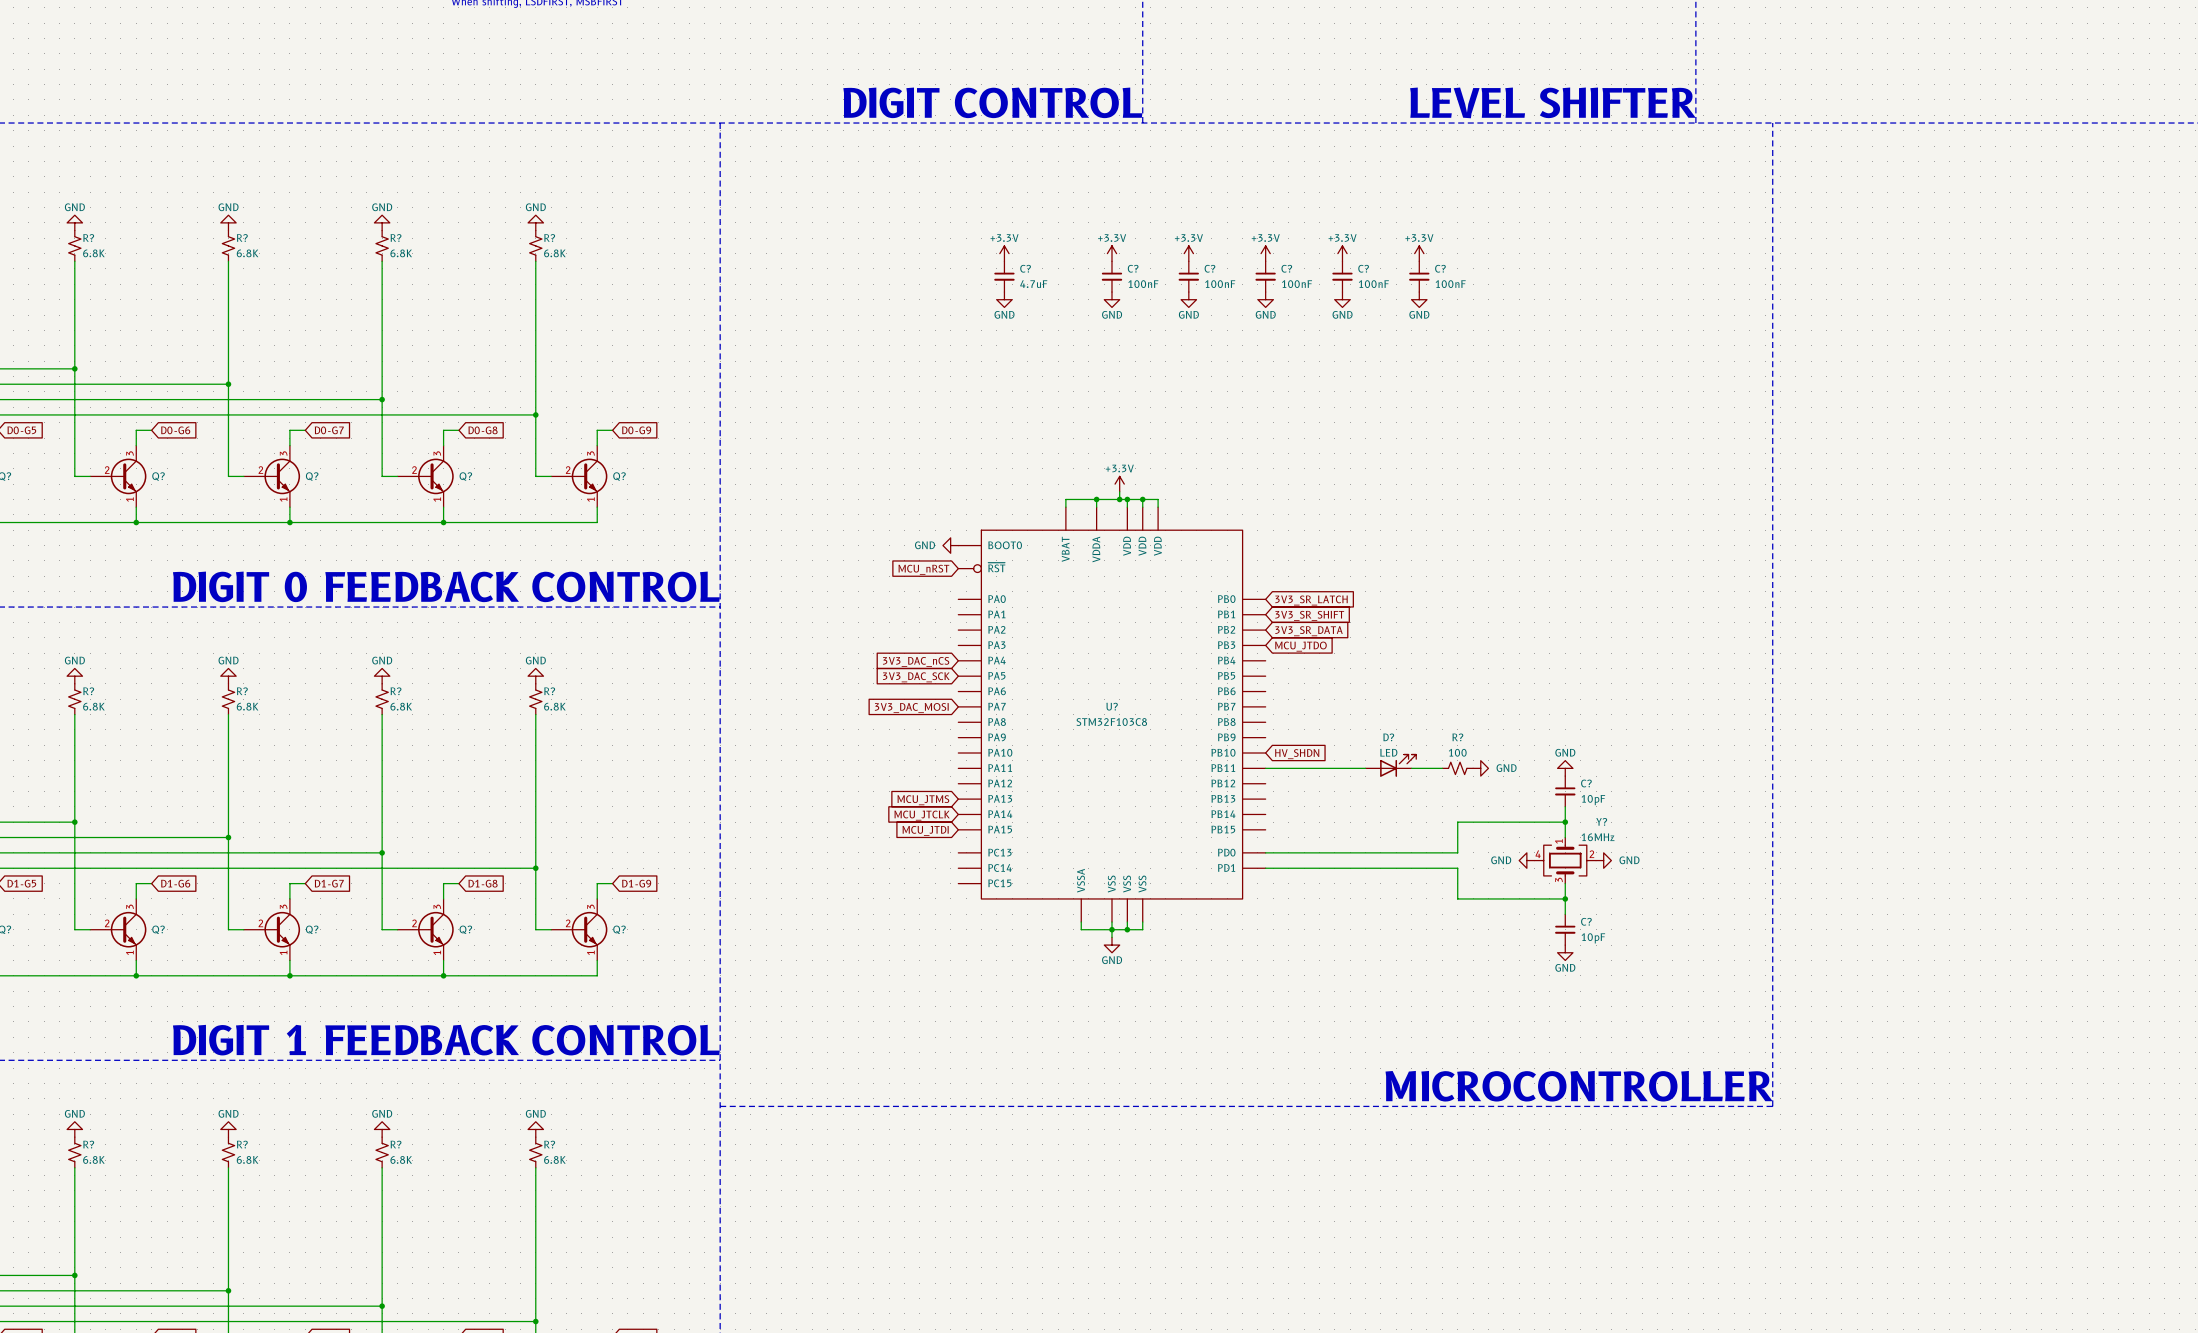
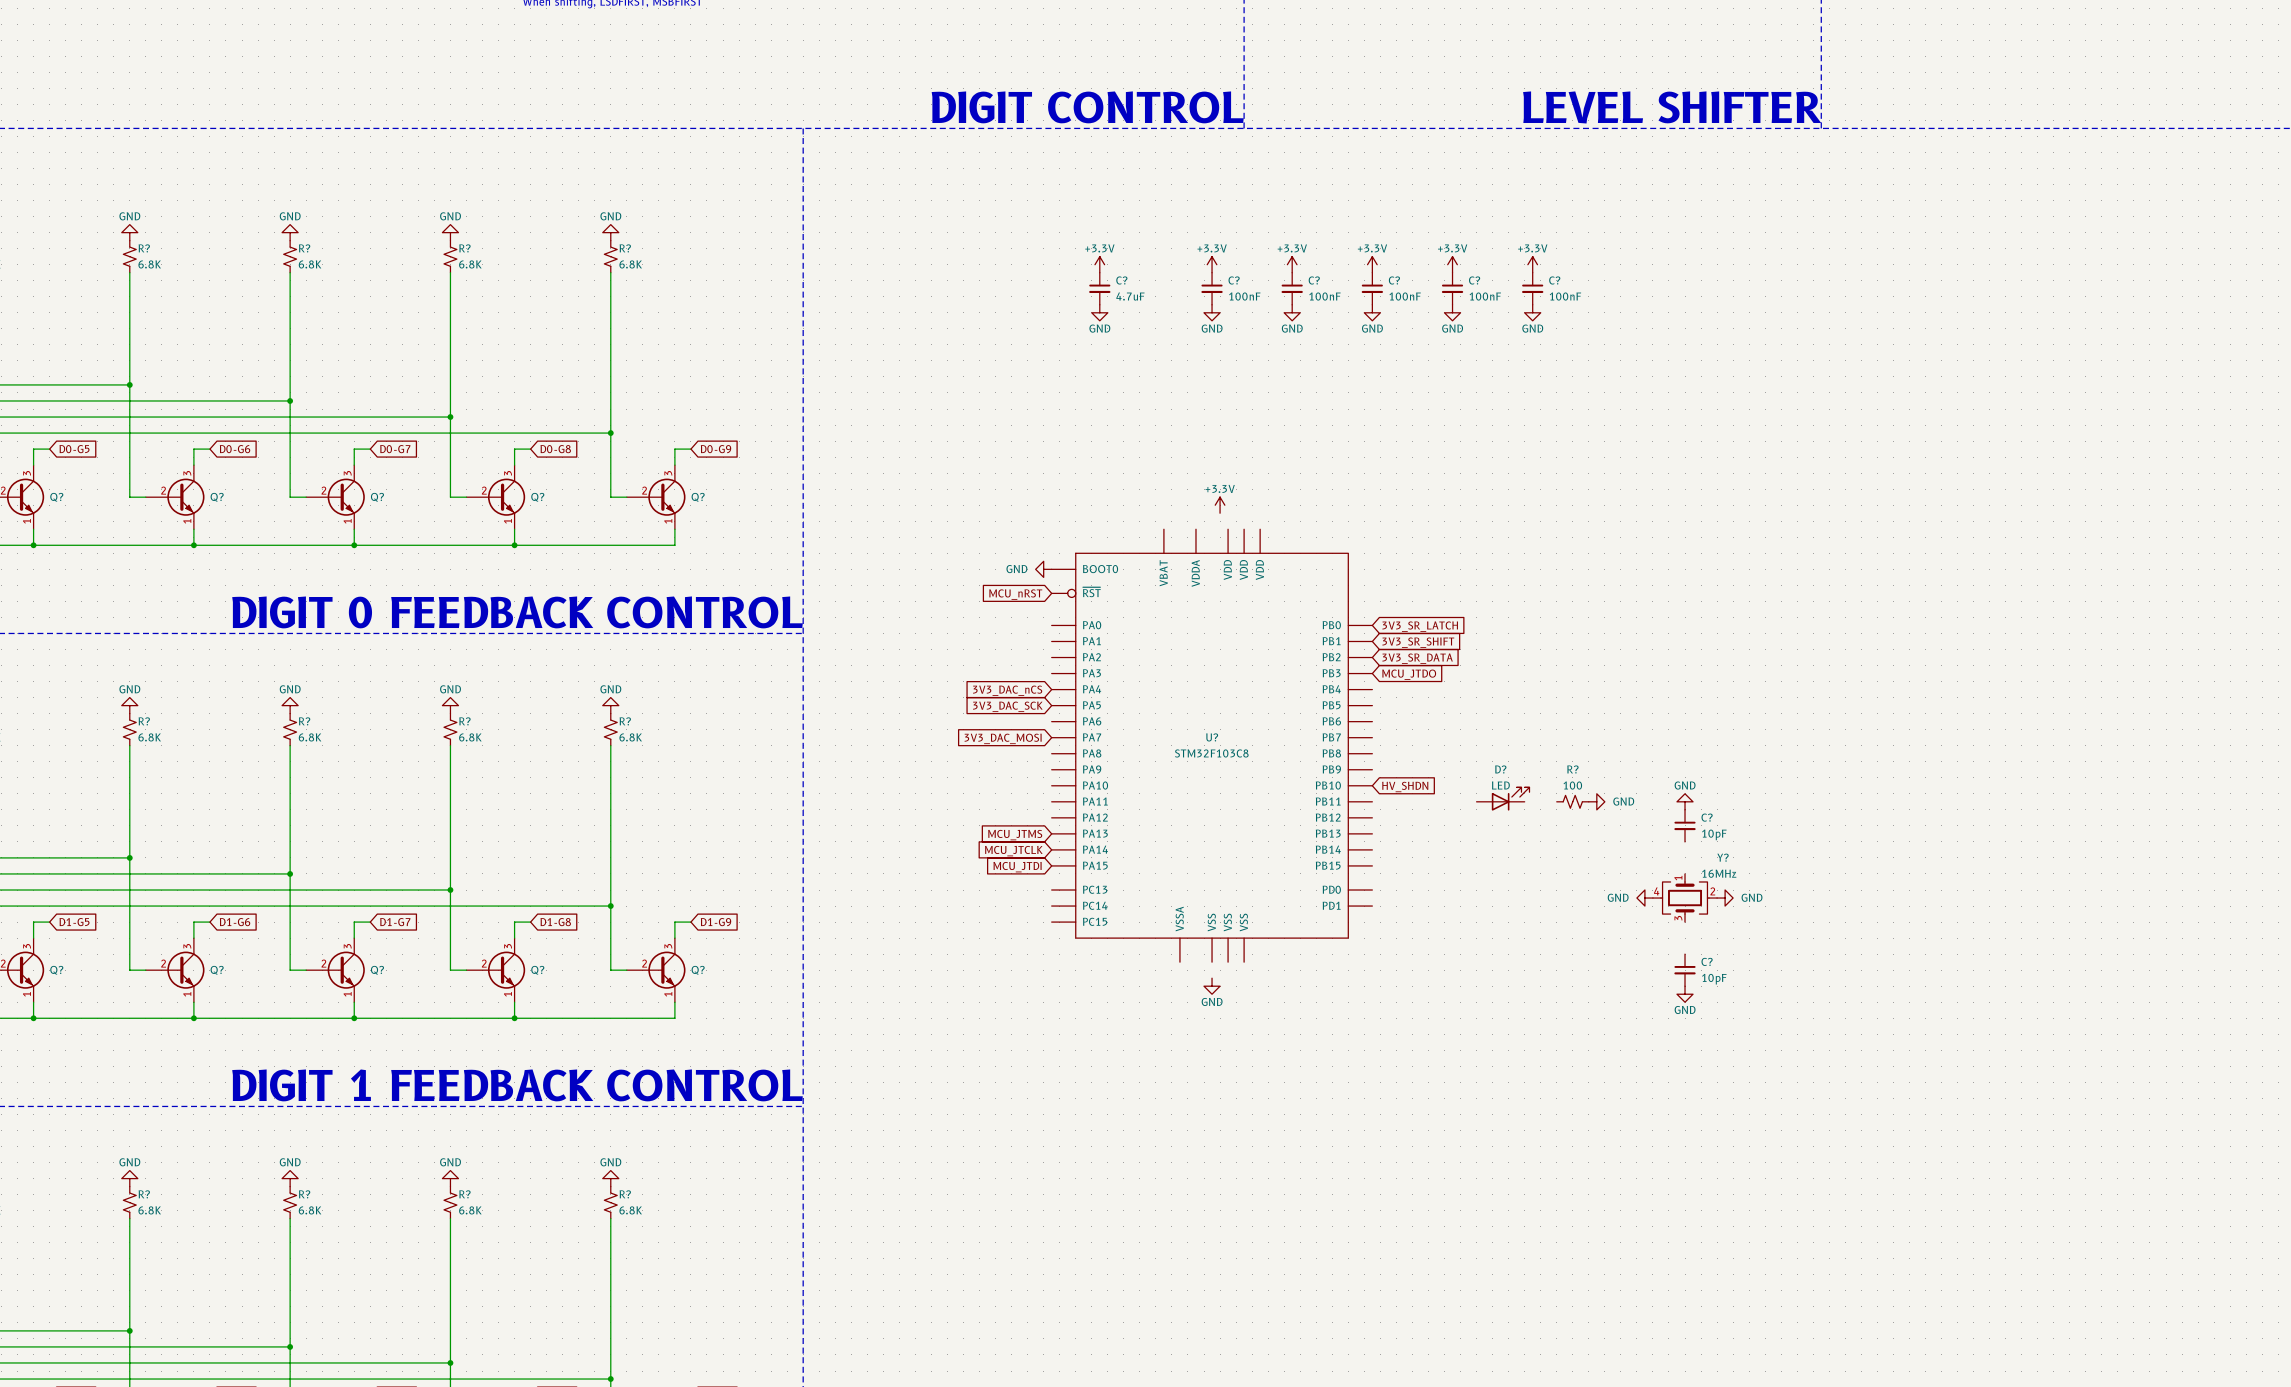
line: (1772, 123) (1772, 1106) (720, 1106) -> none
wire: (1119, 491) (1119, 499) -> none
wire: (1096, 499) (1096, 507) -> none
junction: (1096, 499) -> none
junction: (1119, 499) -> none
wire: (1127, 499) (1127, 507) -> none
junction: (1127, 499) -> none
wire: (1142, 499) (1142, 507) -> none
junction: (1142, 499) -> none
wire: (1065, 507) (1065, 499) (1158, 499) (1158, 507) -> none
wire: (1265, 768) (1365, 768) -> none
wire: (1411, 768) (1442, 768) -> none
wire: (1565, 806) (1565, 837) -> none
wire: (1565, 822) (1457, 822) (1457, 852) (1265, 852) -> none
junction: (1565, 822) -> none
wire: (1265, 868) (1457, 868) (1457, 898) (1565, 898) -> none
wire: (1565, 883) (1565, 914) -> none
junction: (1565, 898) -> none
wire: (1081, 922) (1081, 929) (1142, 929) (1142, 922) -> none
wire: (1111, 922) (1111, 937) -> none
wire: (1127, 922) (1127, 929) -> none
junction: (1111, 929) -> none
junction: (1127, 929) -> none
text: MICROCONTROLLER (1579, 1086) -> none

